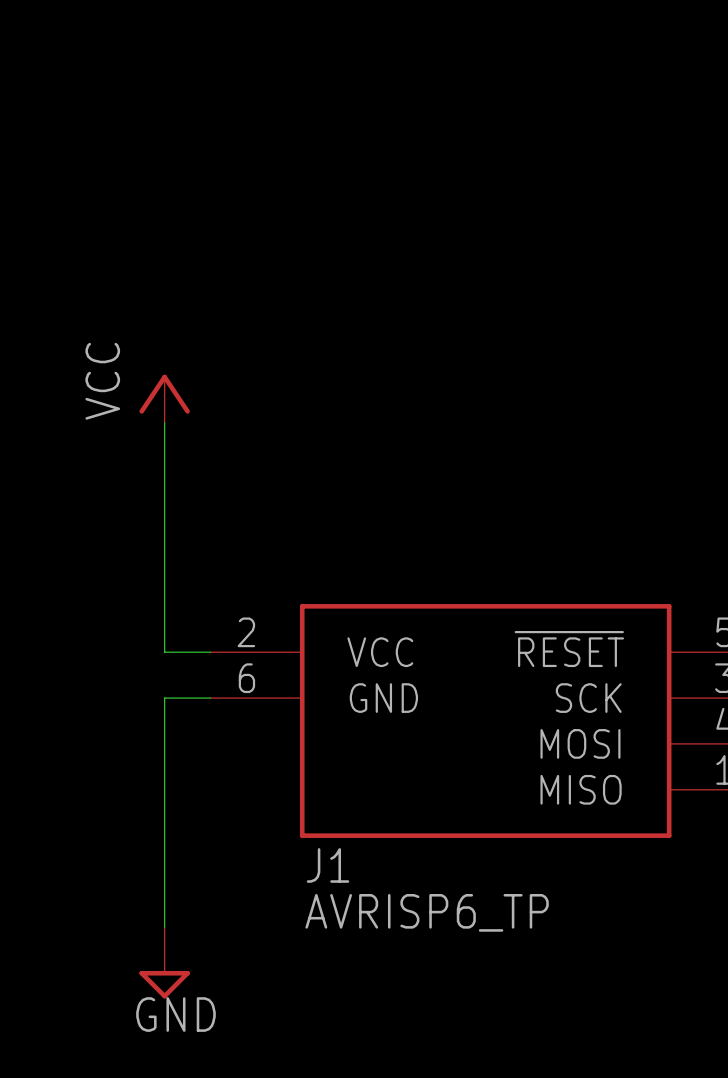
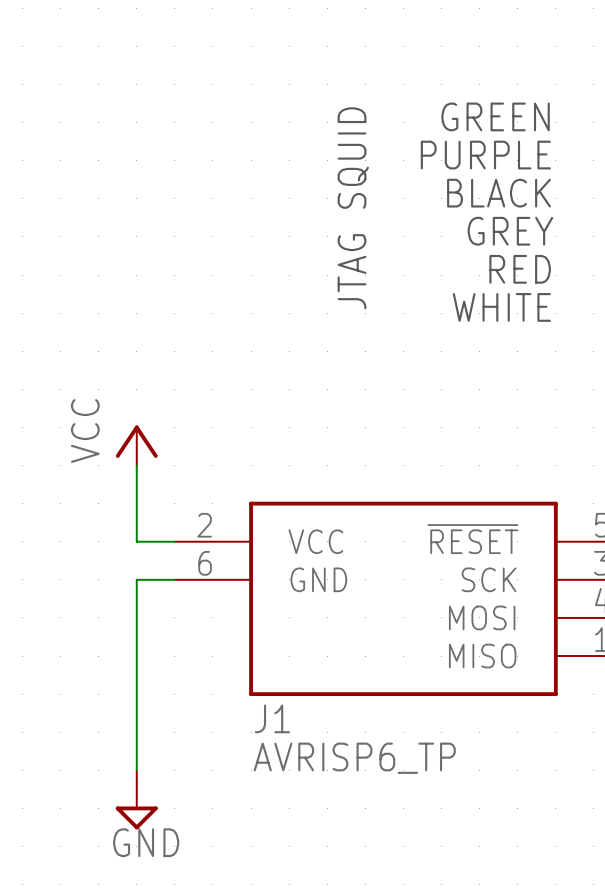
text: none -> GREEN (495, 116)
text: none -> PURPLE (485, 155)
text: none -> BLACK (499, 193)
text: none -> JTAG SQUID (353, 208)
text: none -> GREY (510, 231)
text: none -> RED (520, 269)
text: none -> WHITE (501, 307)
power symbol position: VCC (164, 398) -> VCC (136, 445)
wire: (164, 422) (164, 560) -> none

